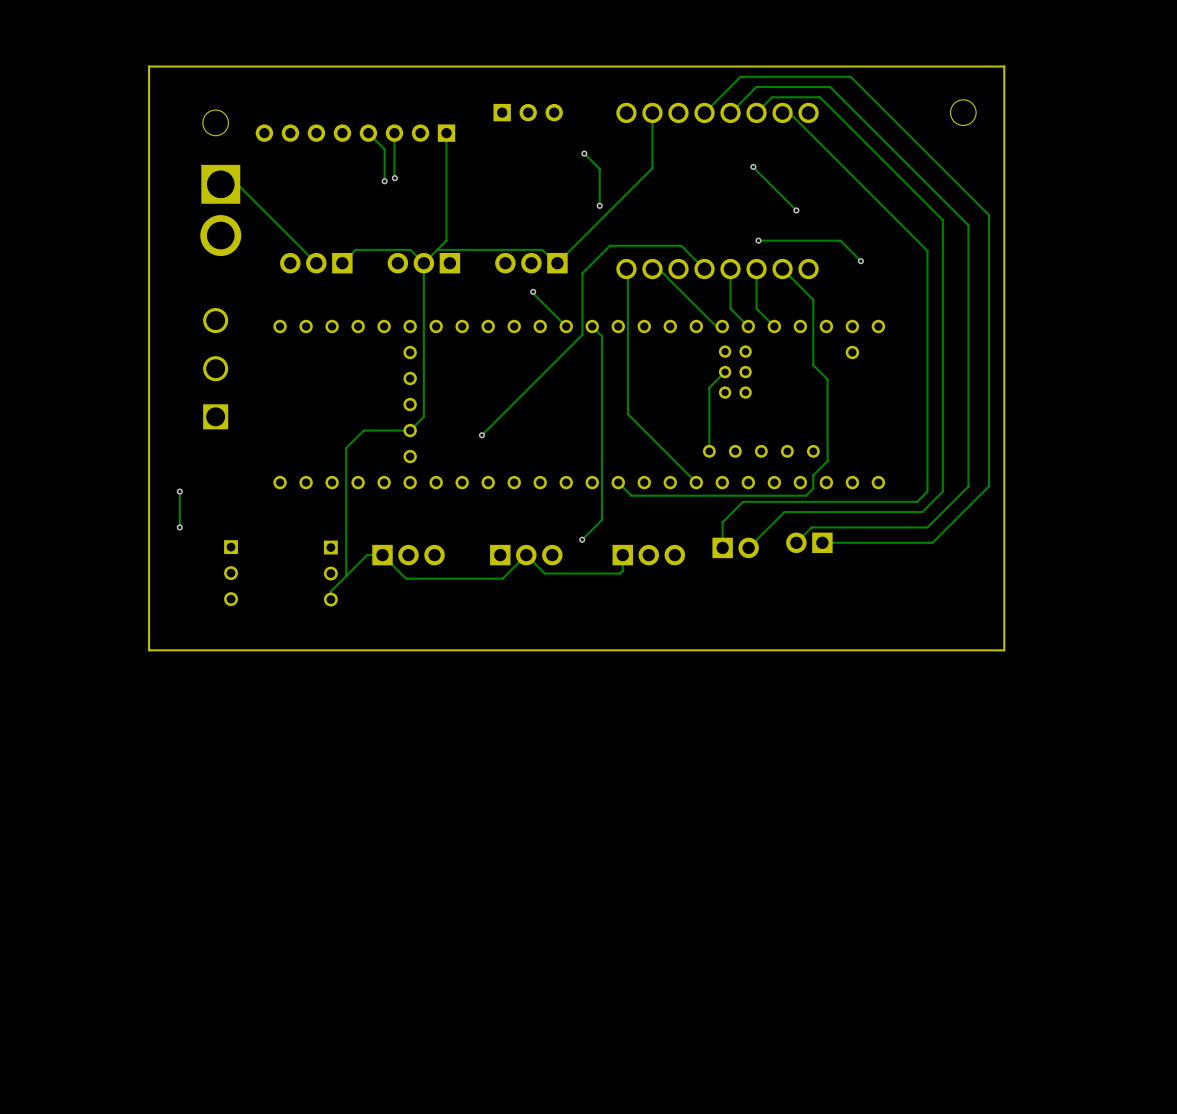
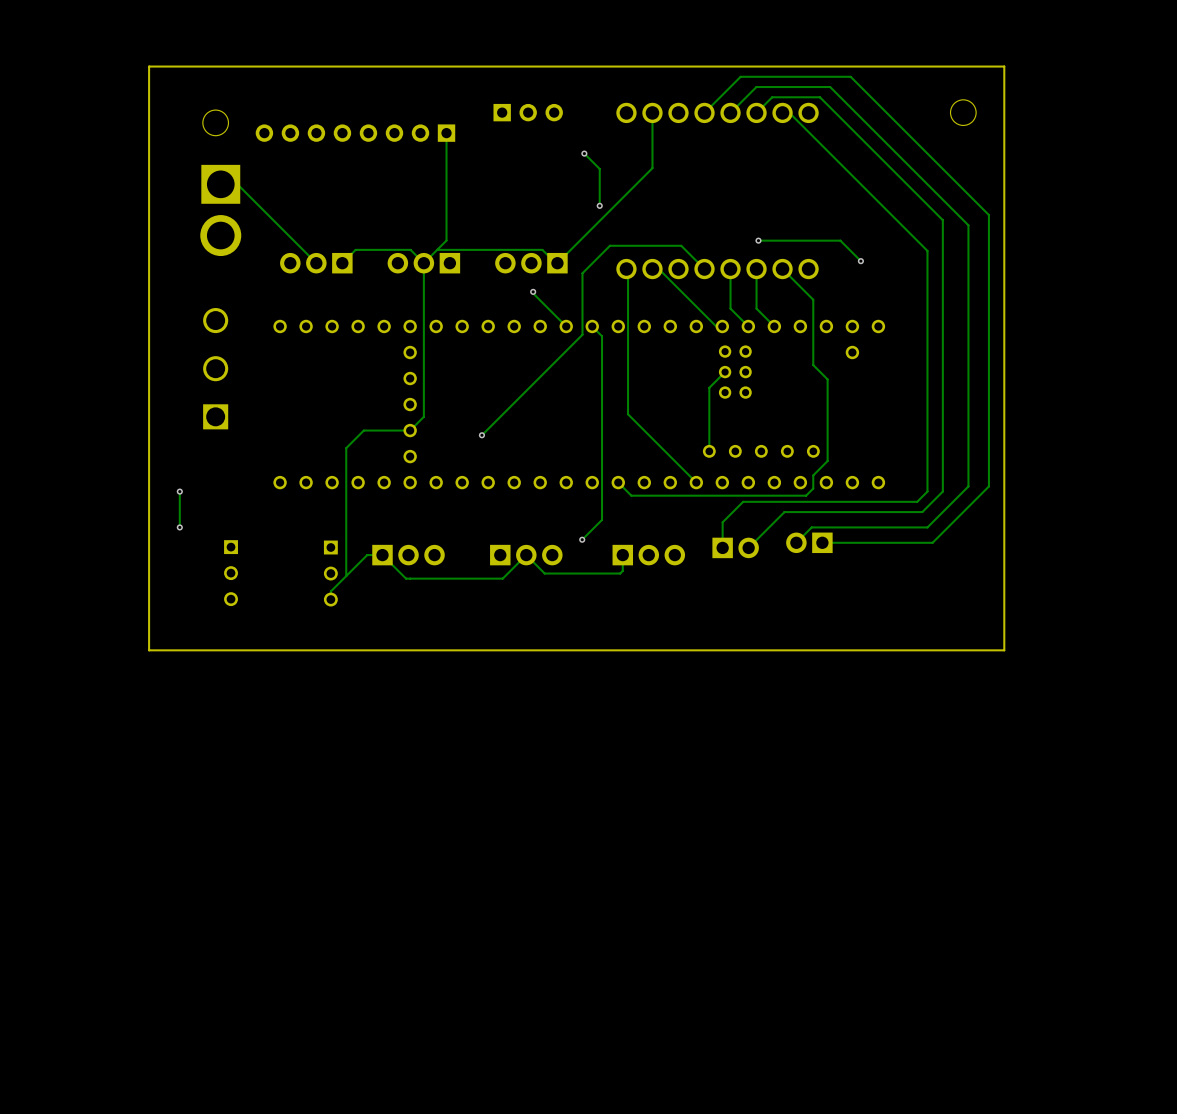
track: (368, 133) (384, 149) (384, 181) -> none
track: (394, 133) (394, 178) -> none
track: (753, 166) (796, 210) -> none
via: (753, 166) -> none
via: (394, 178) -> none
via: (384, 181) -> none
via: (796, 210) -> none

